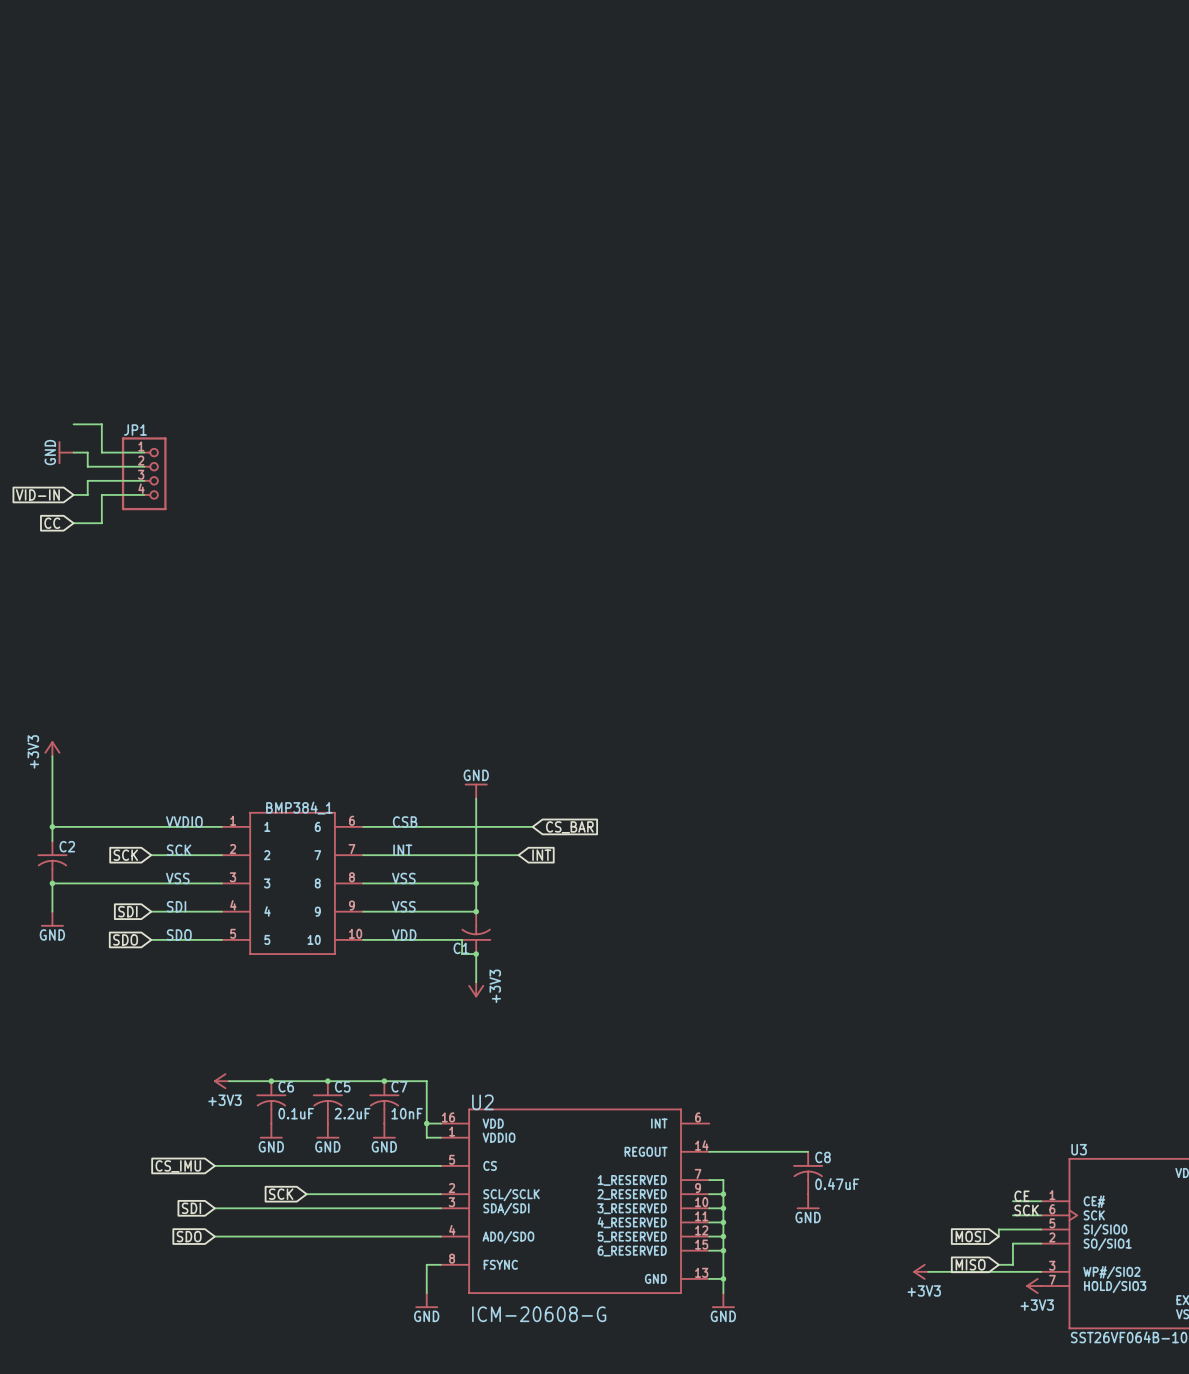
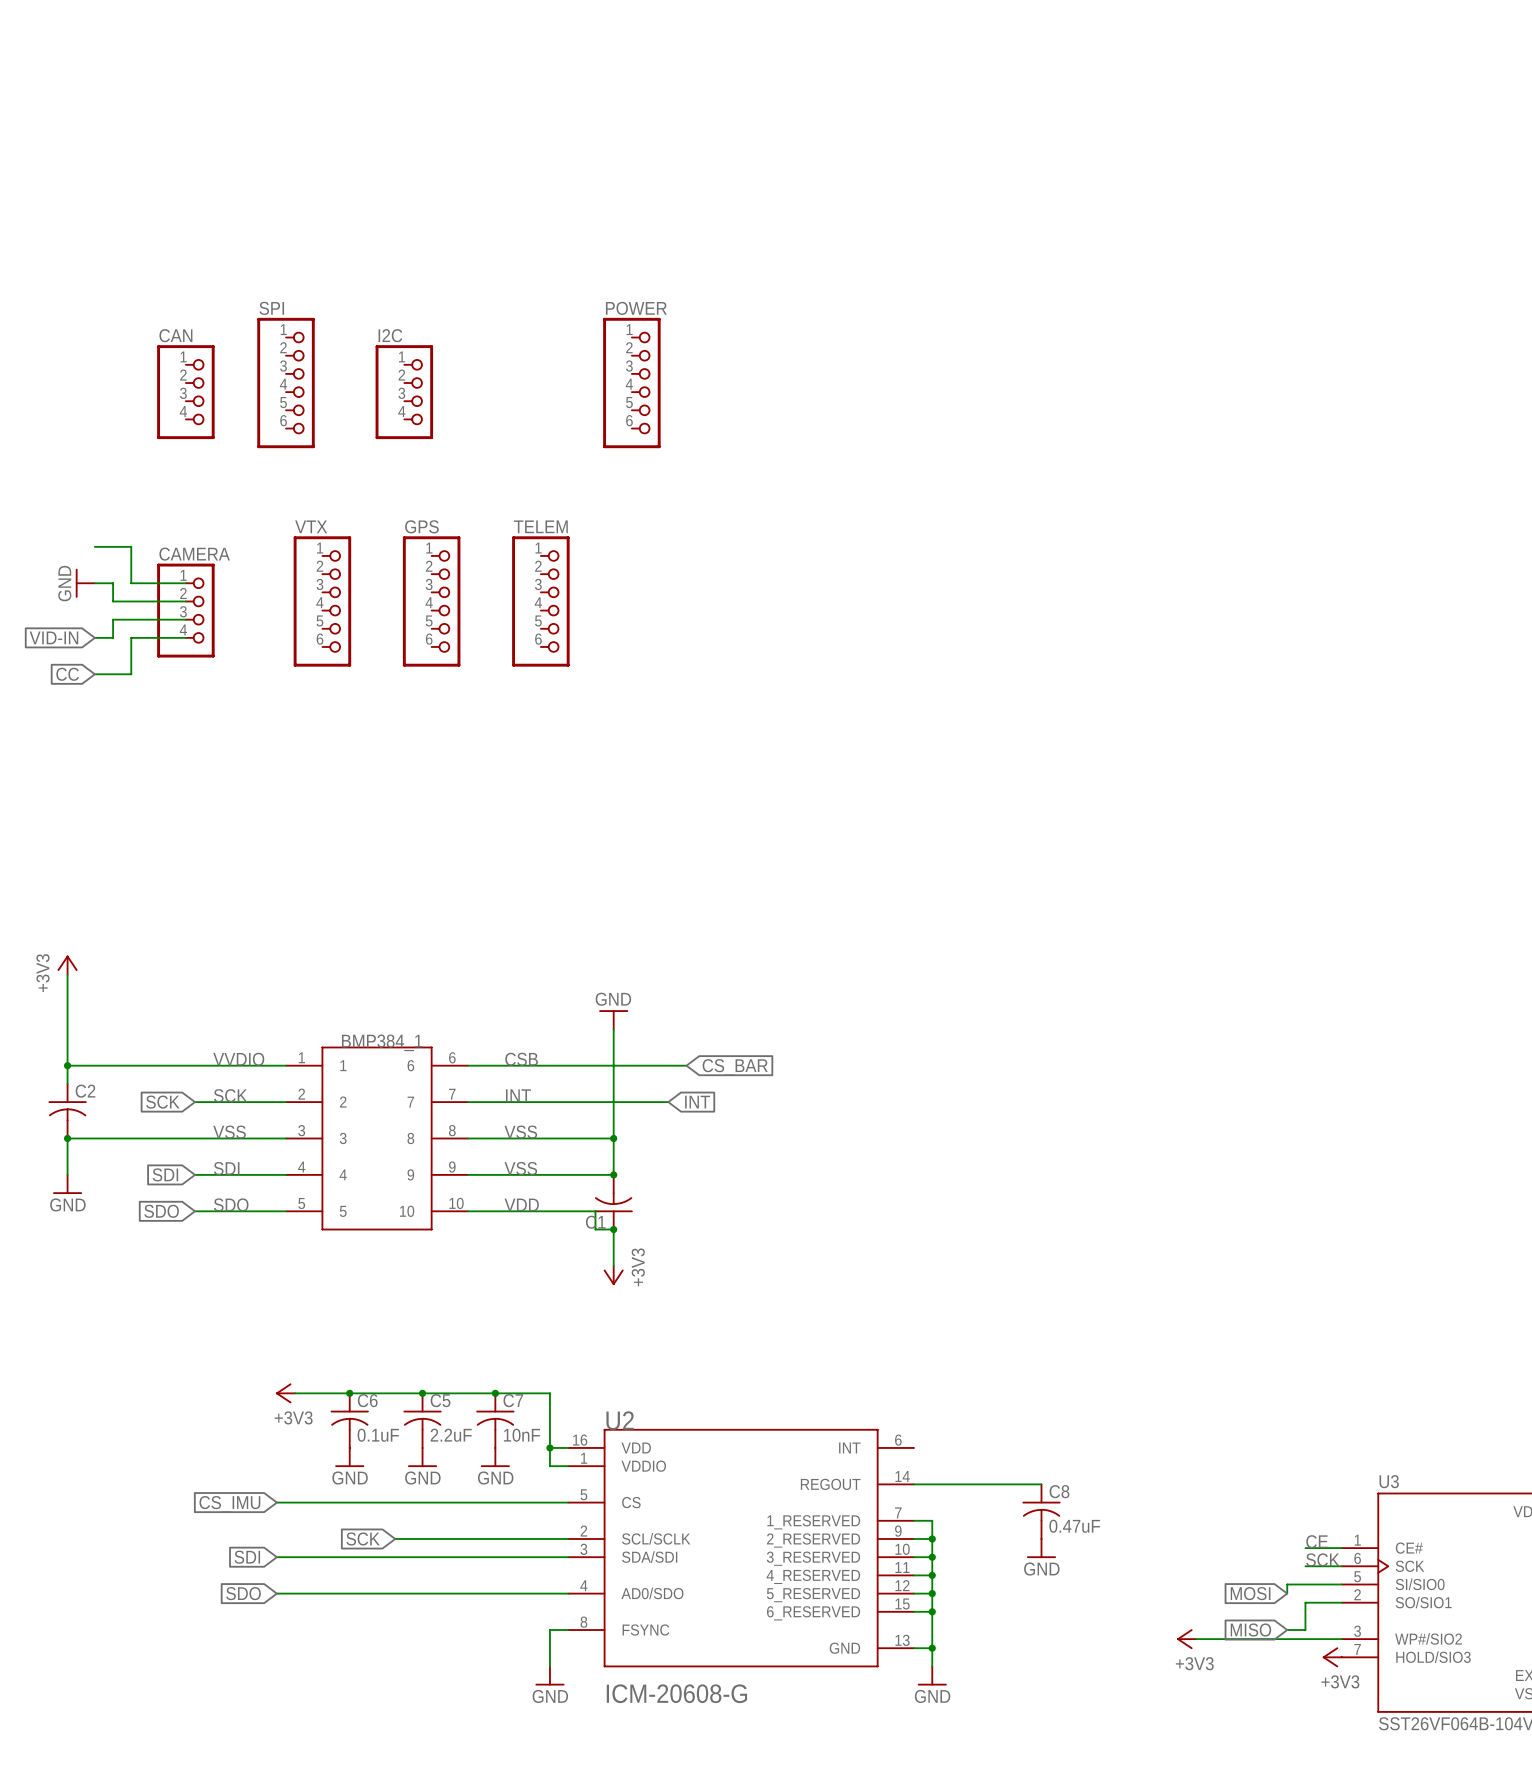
SPI: none -> (286, 383)
POWER: none -> (631, 383)
CAN: none -> (185, 392)
I2C: none -> (404, 392)
JP1 name: JP1 (135, 429) -> CAMERA (194, 554)
VTX: none -> (322, 601)
GPS: none -> (431, 601)
TELEM: none -> (540, 601)

